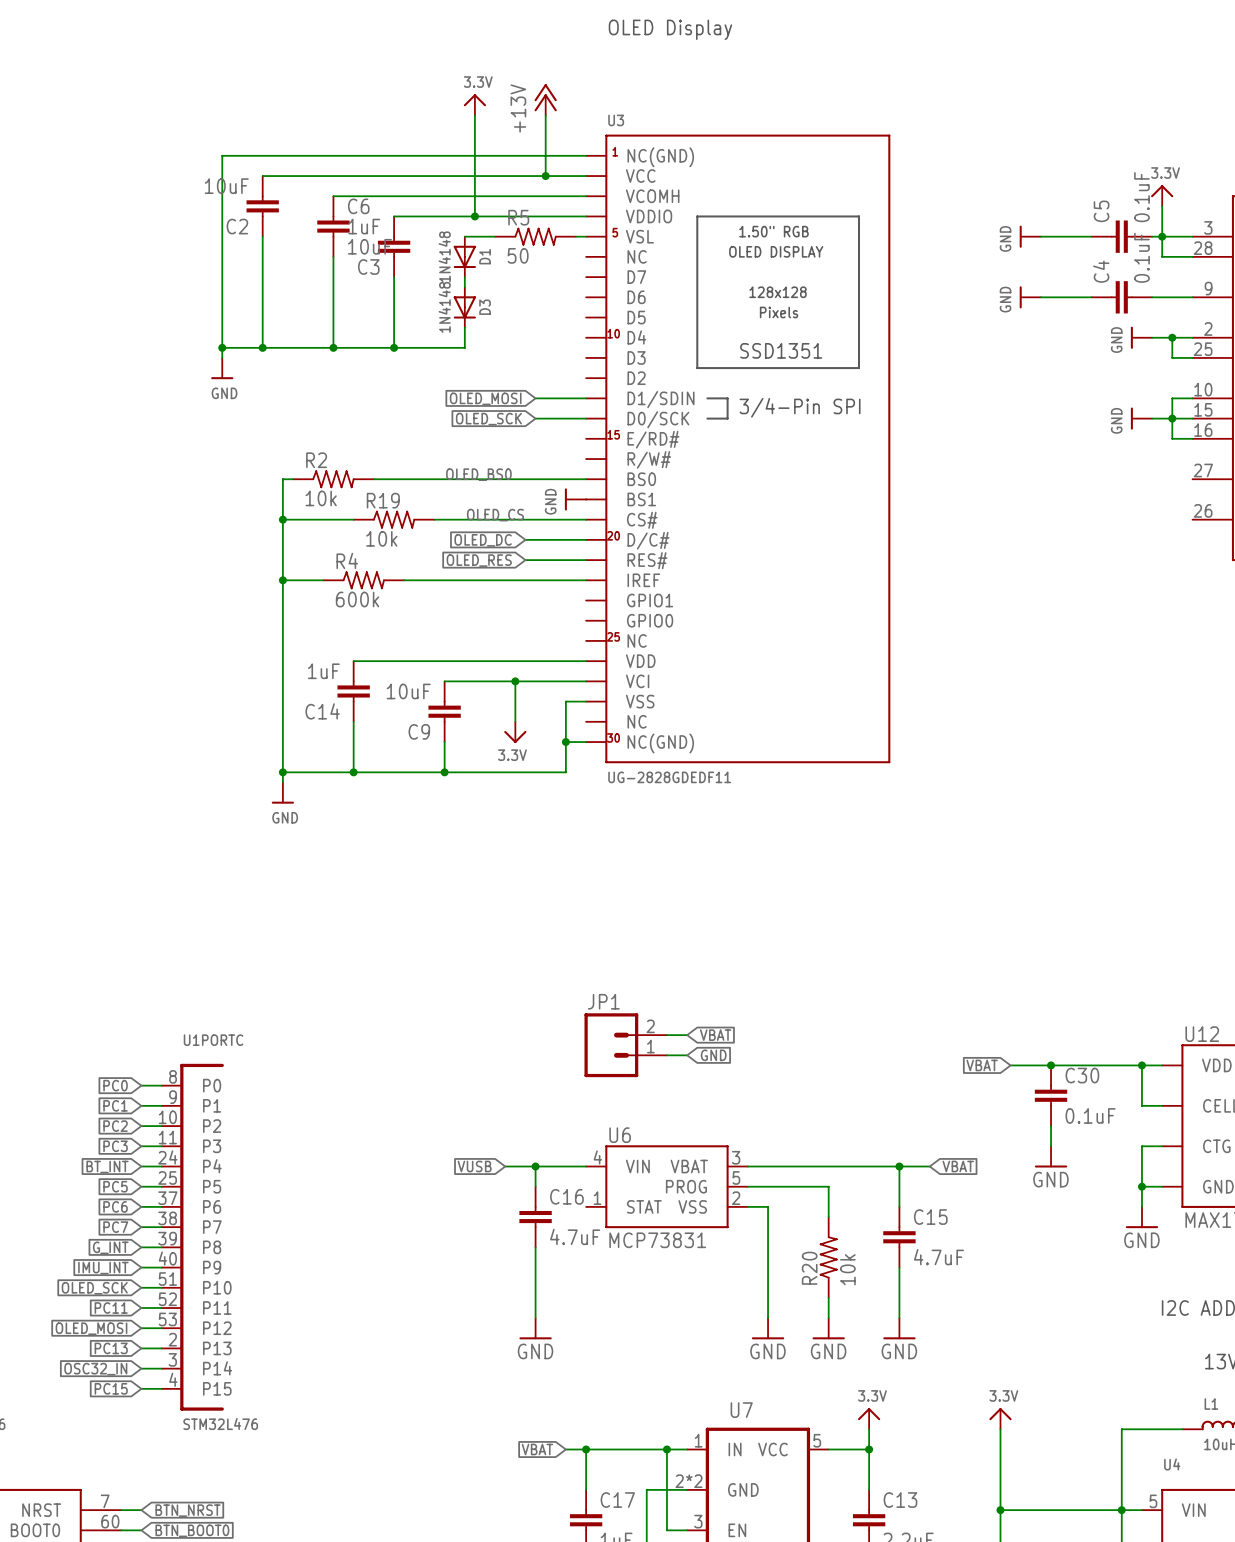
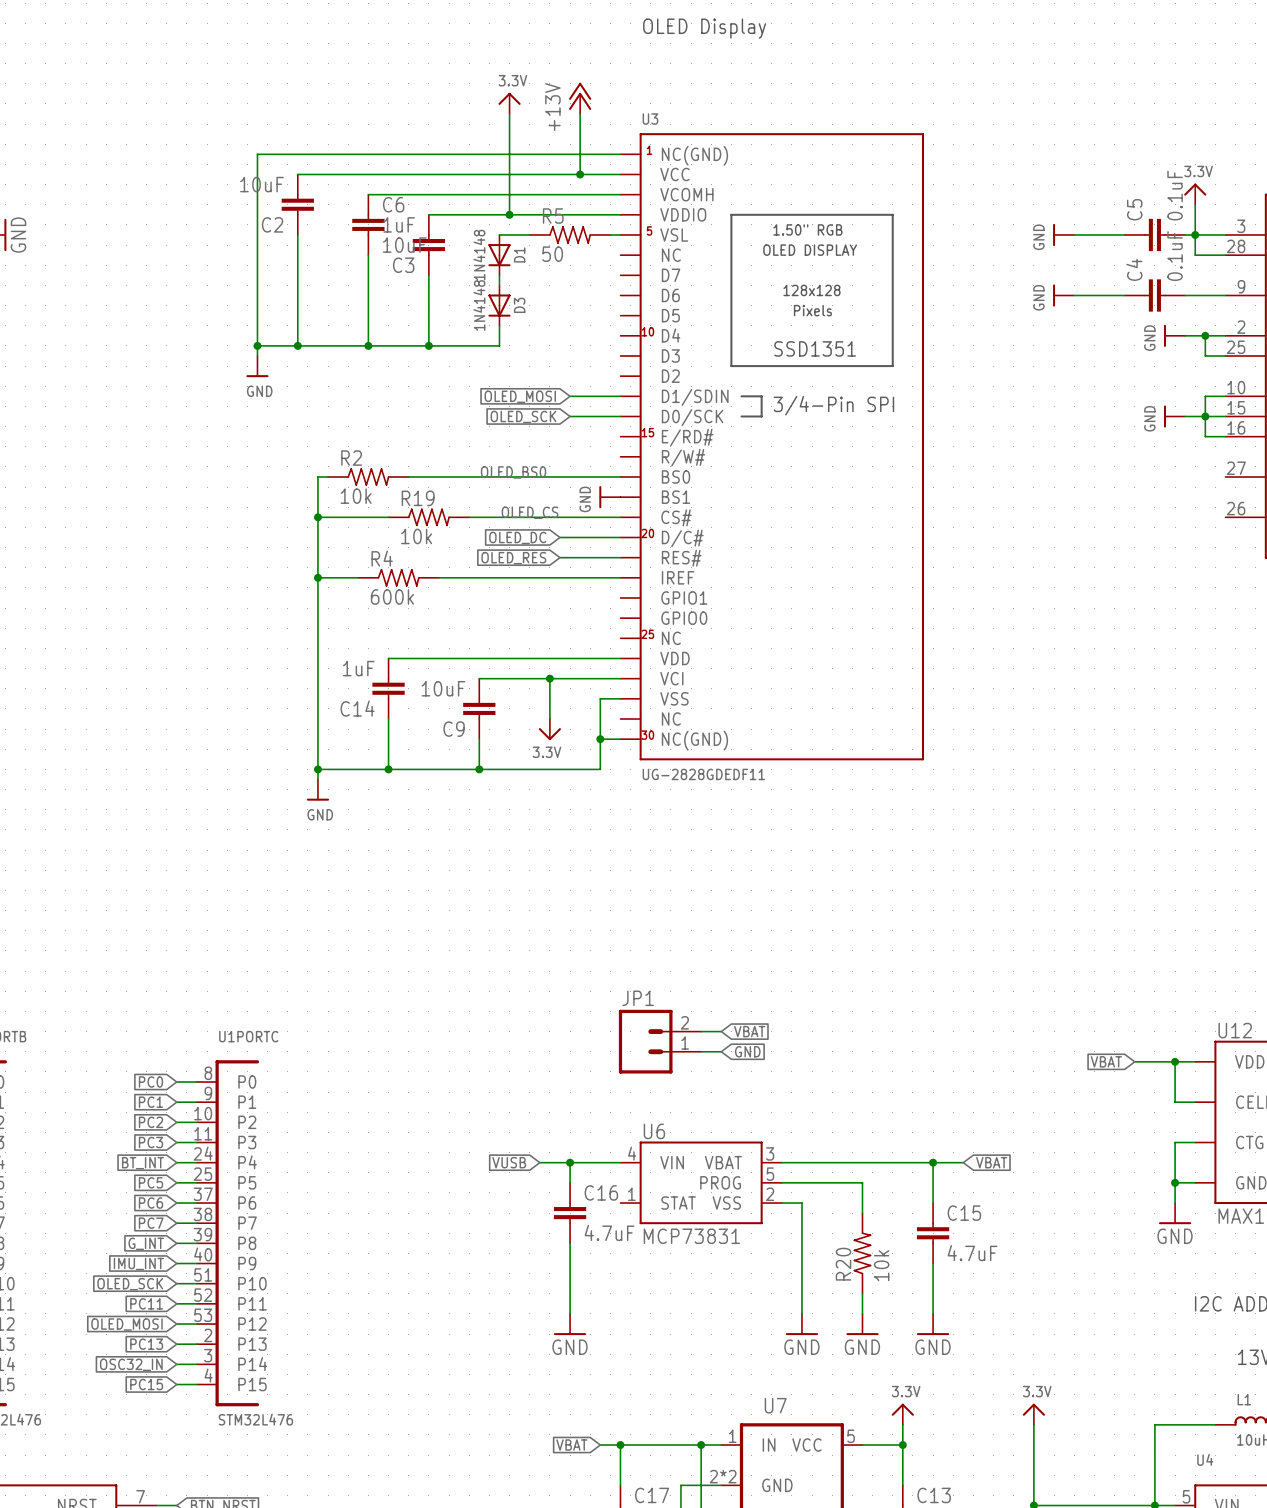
global label position: VBAT (982, 1065) -> VBAT (1106, 1061)
wire: (1010, 1065) (1101, 1065) -> none
junction: (1051, 1065) -> none
C30: 0.1uF (1051, 1095) -> none
wire: (1051, 1126) (1051, 1146) -> none
power symbol: GND (1051, 1156) -> none

